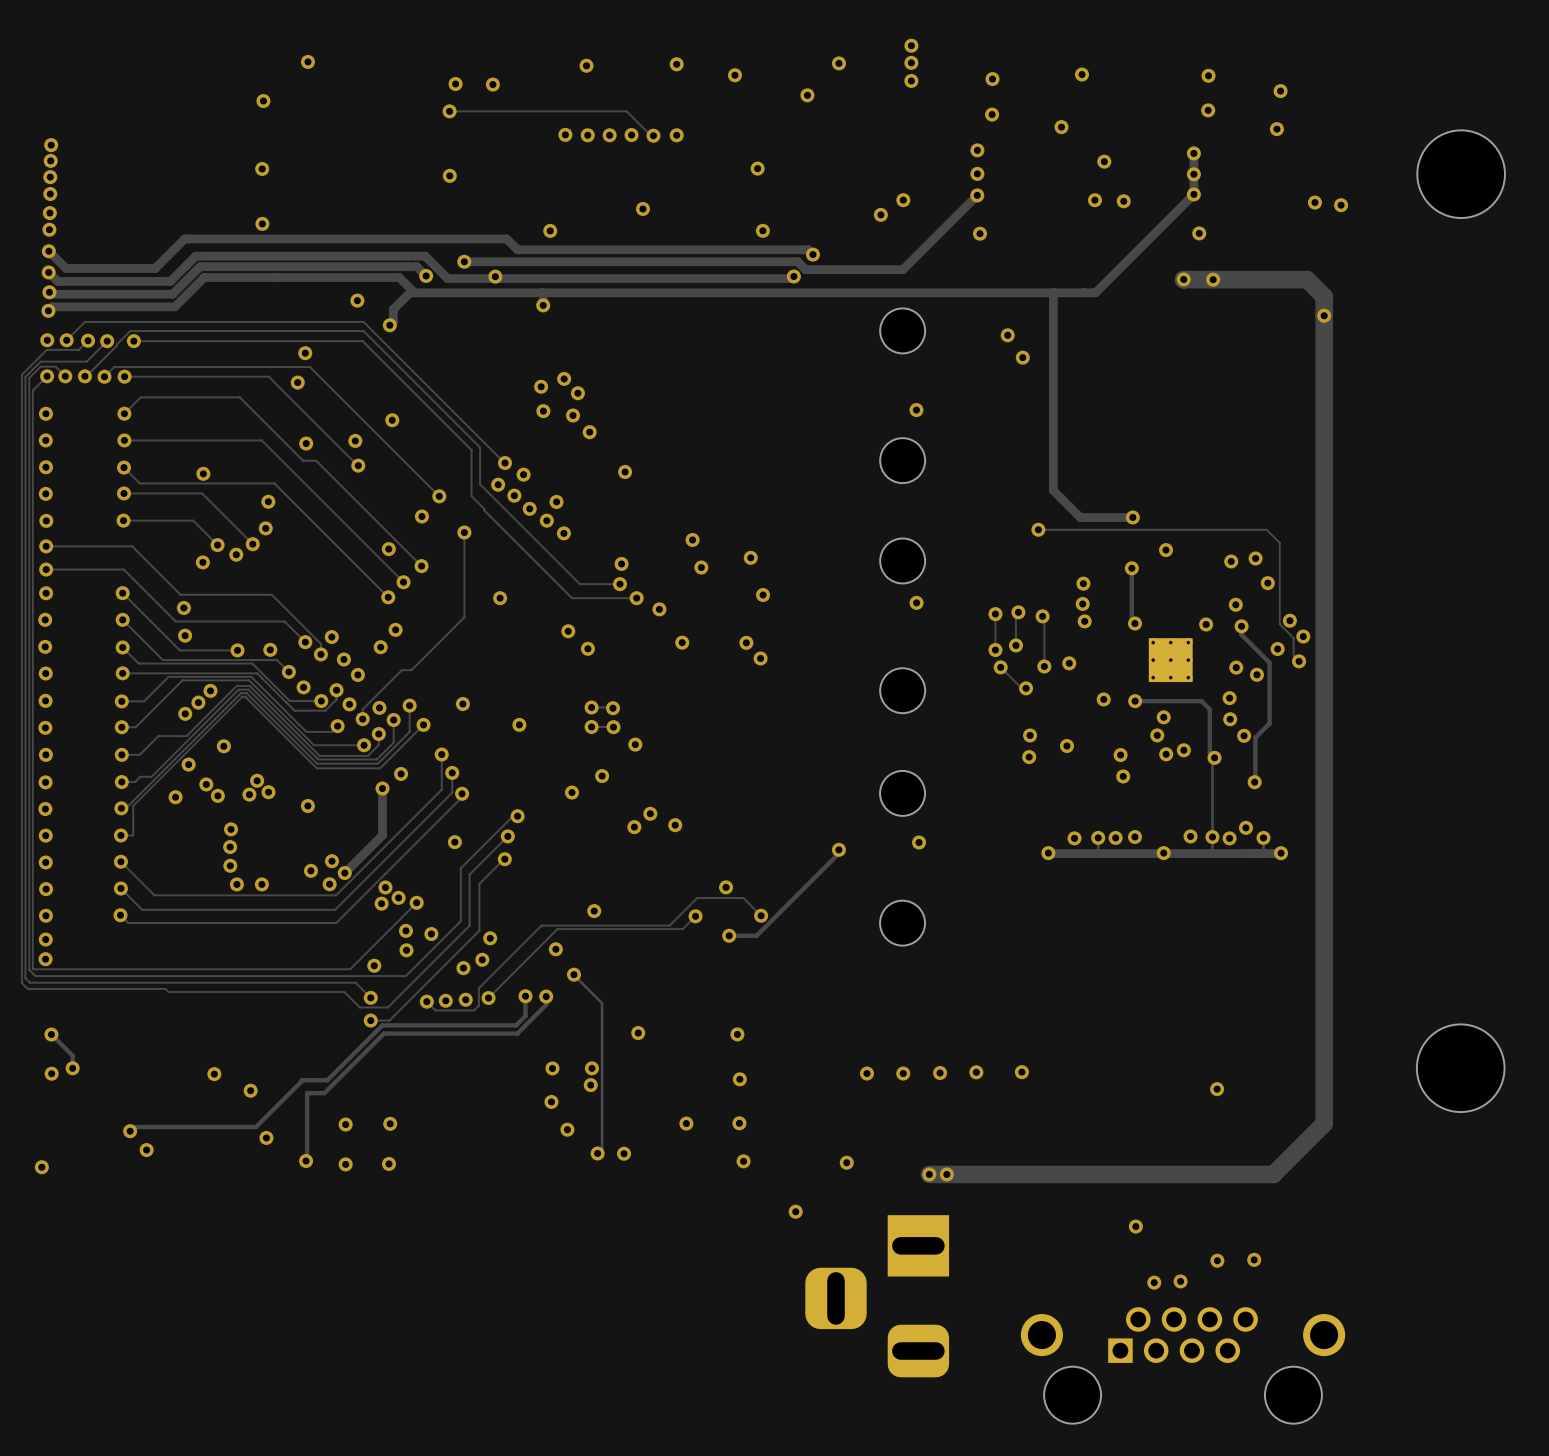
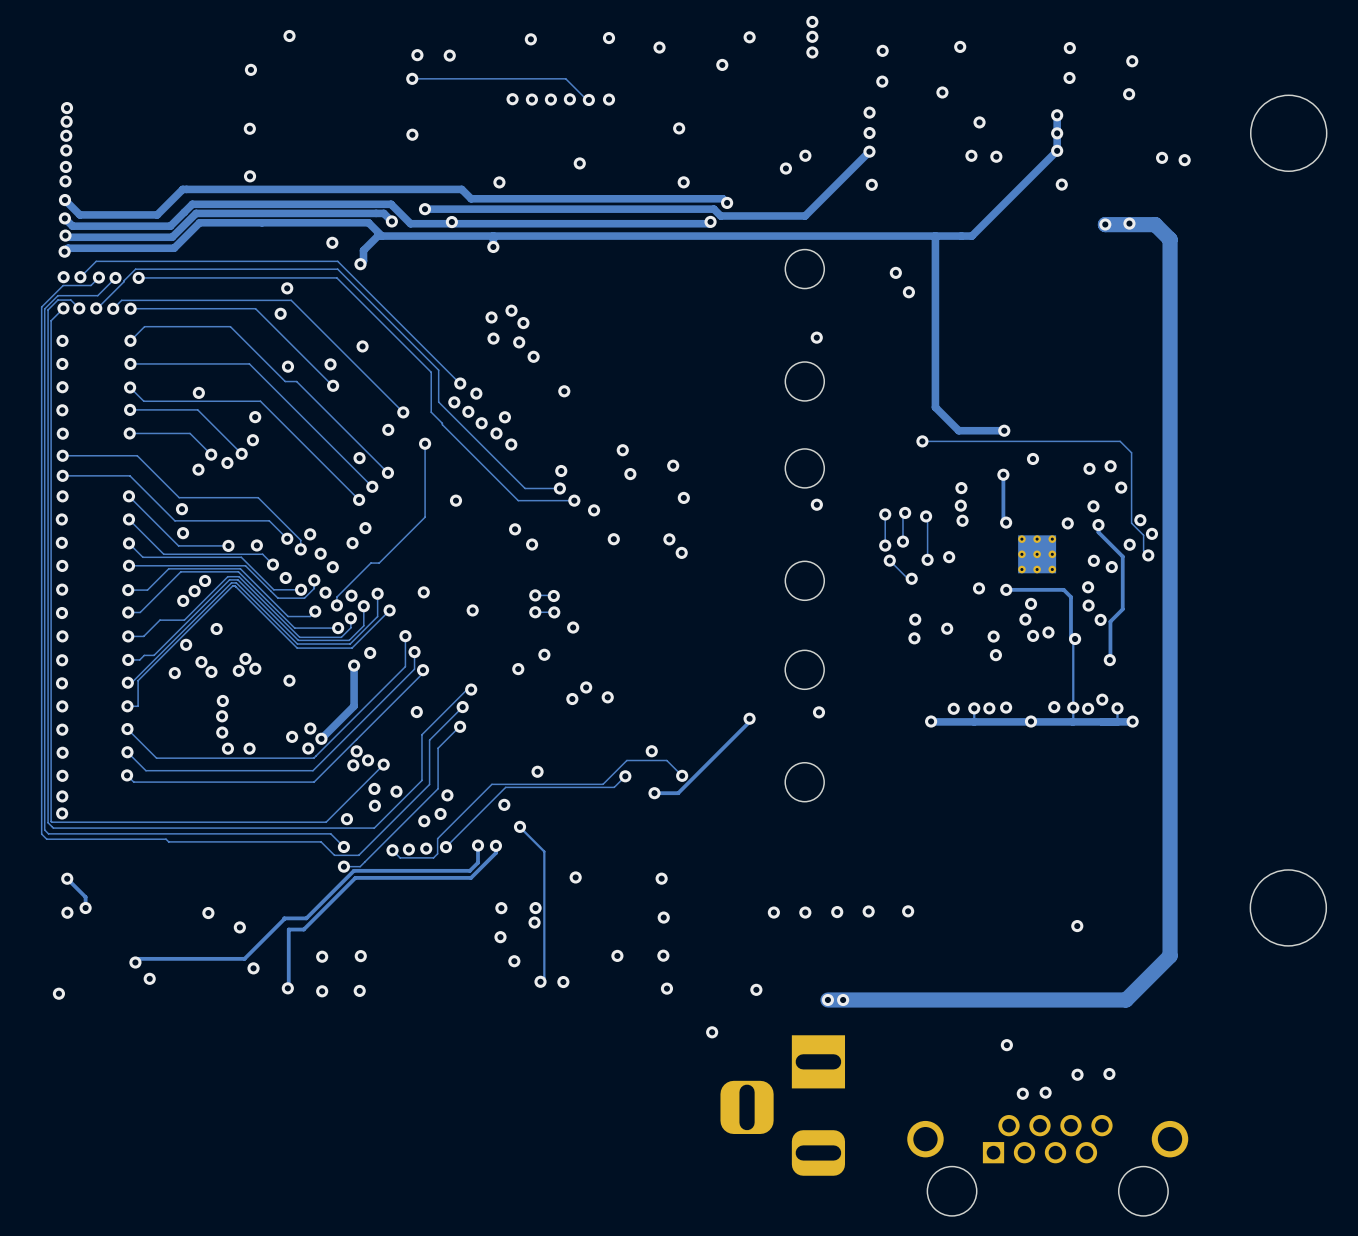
via: none -> (1129, 223)
via: (1183, 279) -> none
via: (1213, 279) -> none
track: (1249, 279) (1183, 279) -> none
via: none -> (1105, 224)
via: (1324, 315) -> none

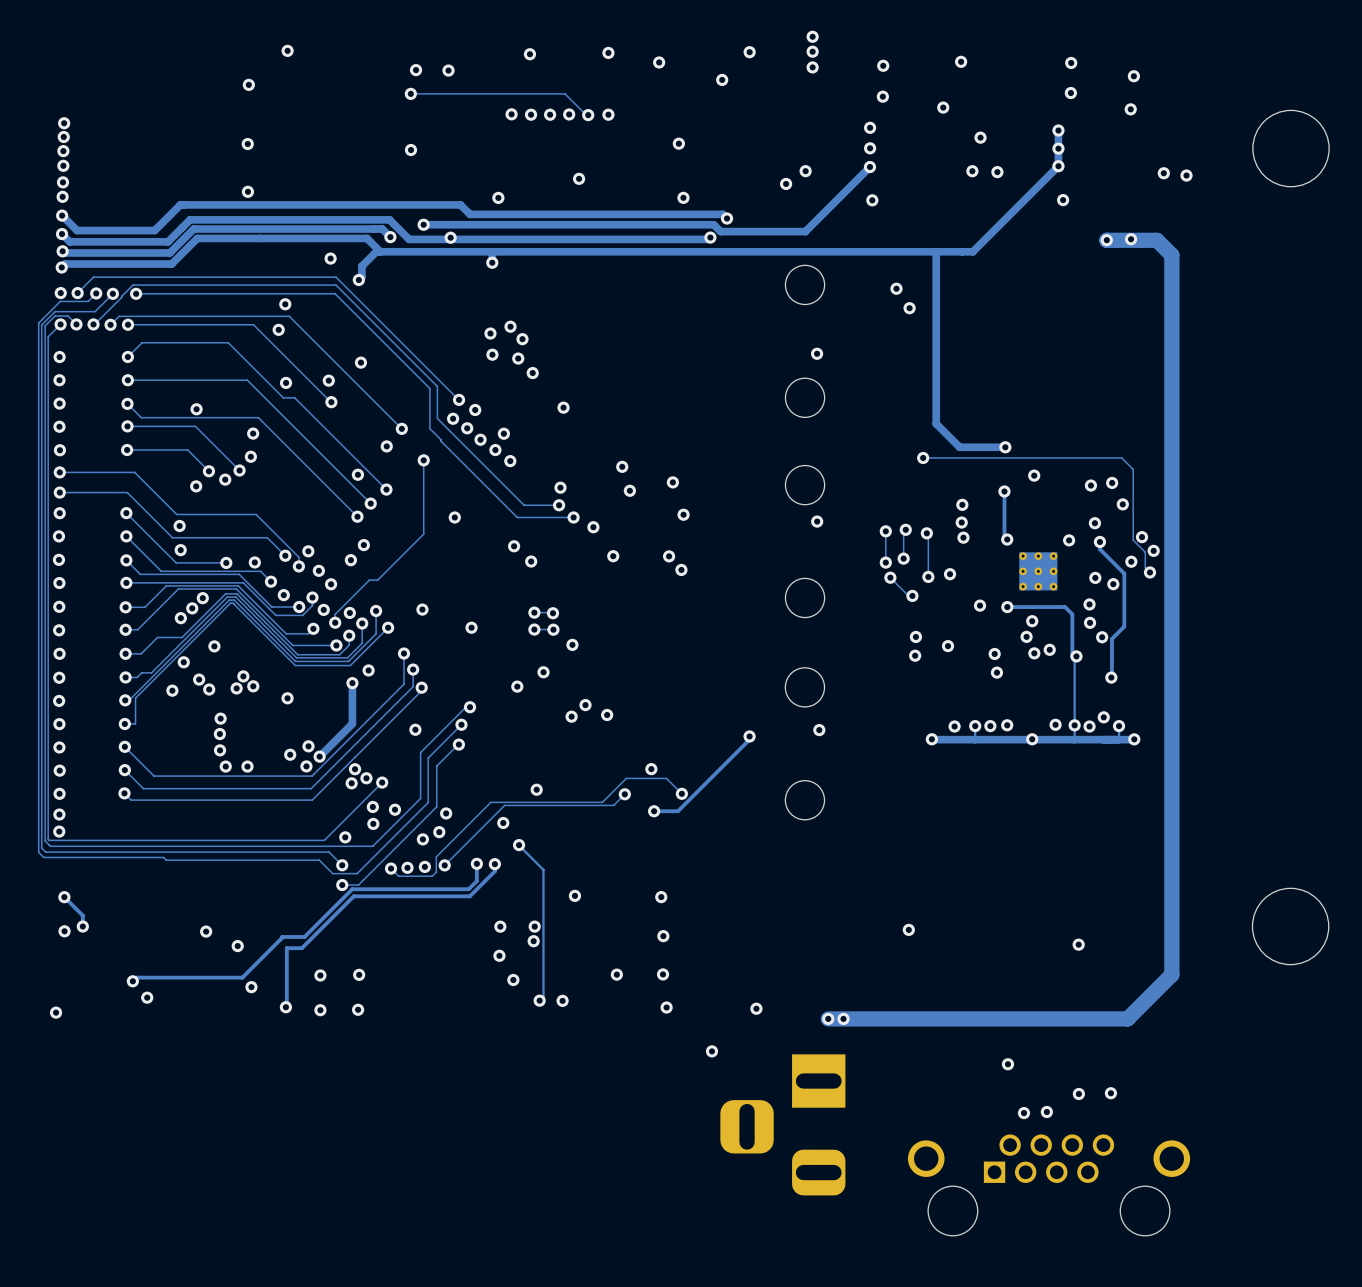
via: (868, 911) -> none
via: (773, 912) -> none
via: (805, 912) -> none
via: (837, 912) -> none

